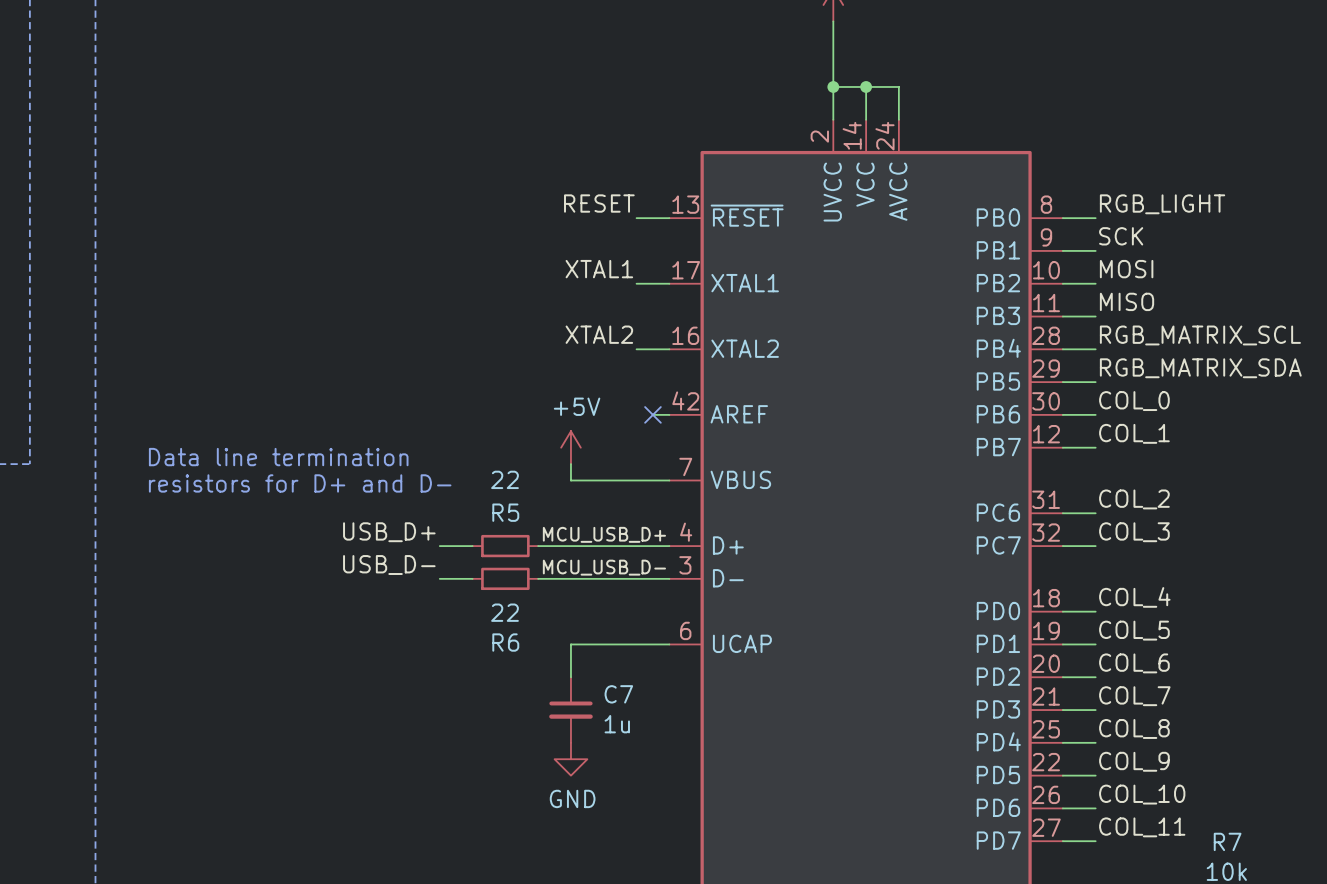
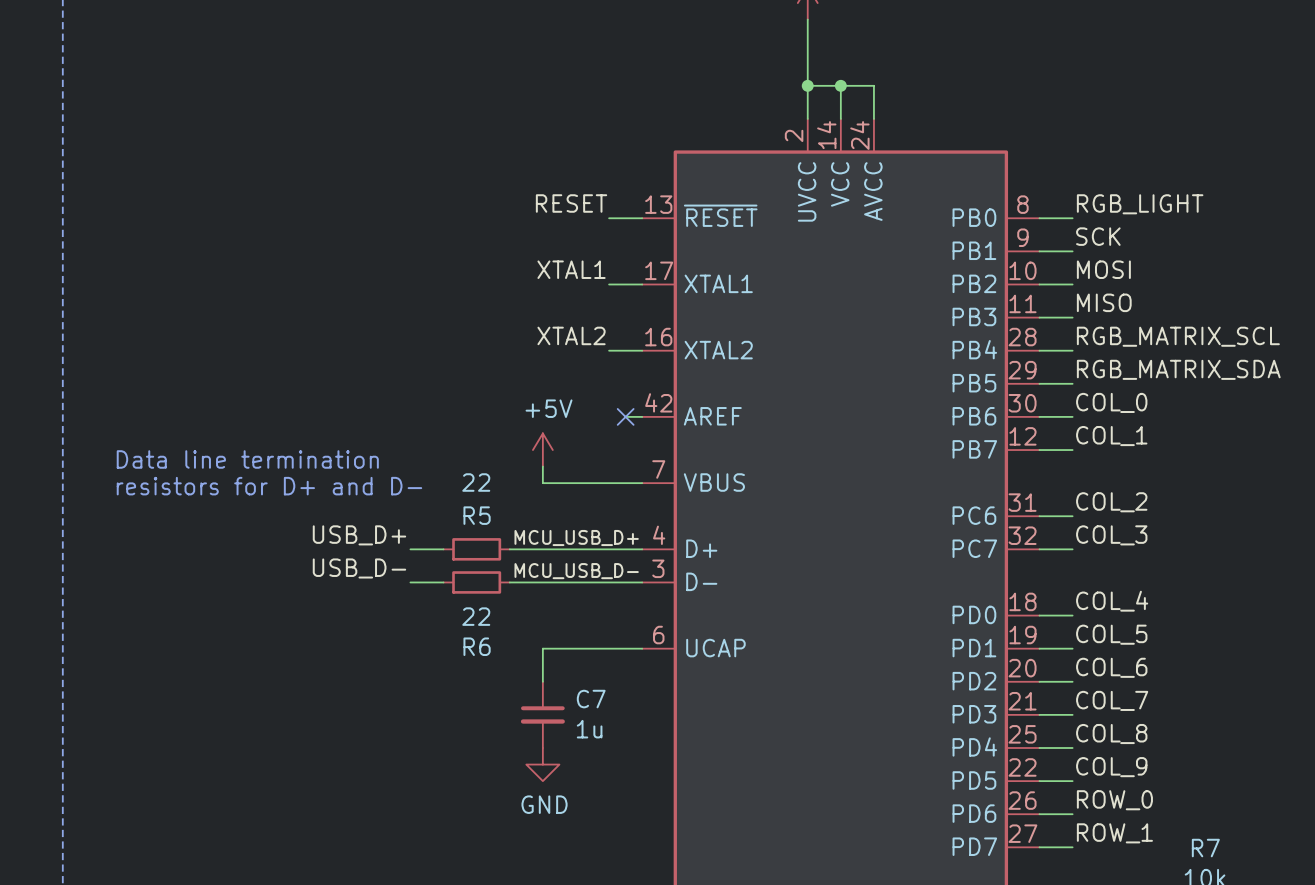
label: COL_10 (1142, 794) -> ROW_0 (1114, 800)
label: COL_11 (1142, 827) -> ROW_1 (1114, 833)

